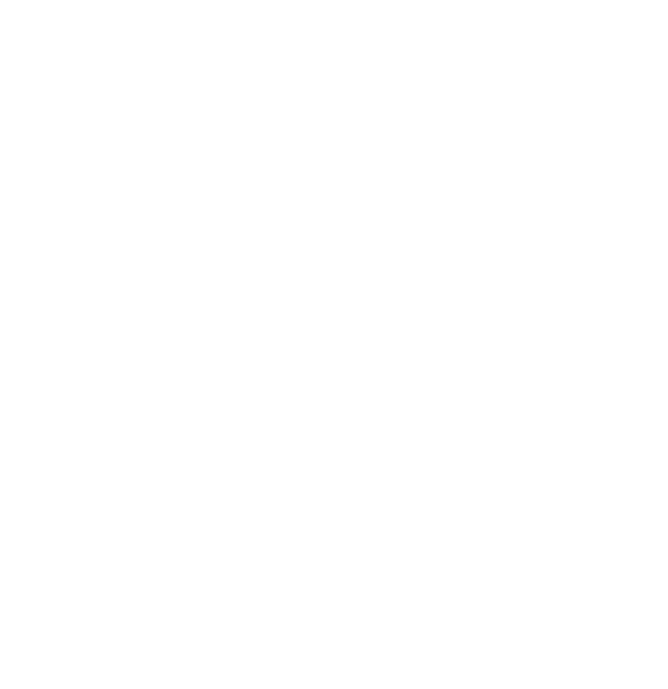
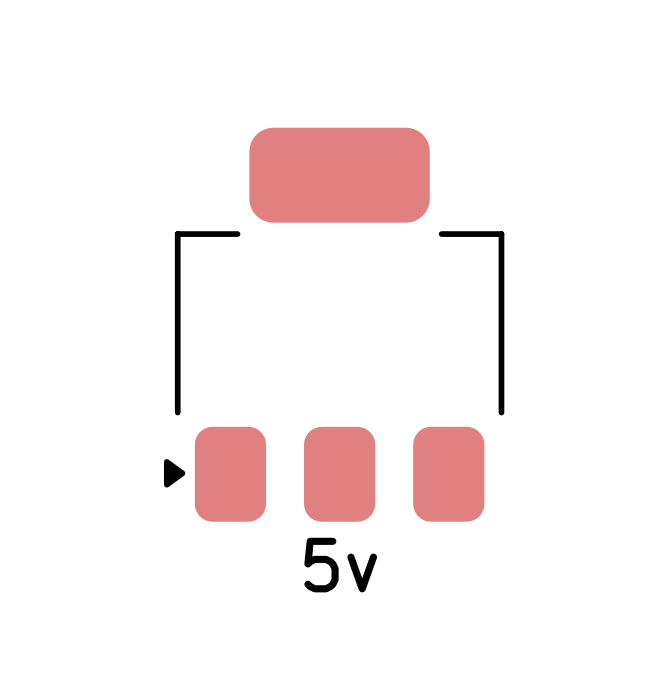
5v: none -> (334, 324)

